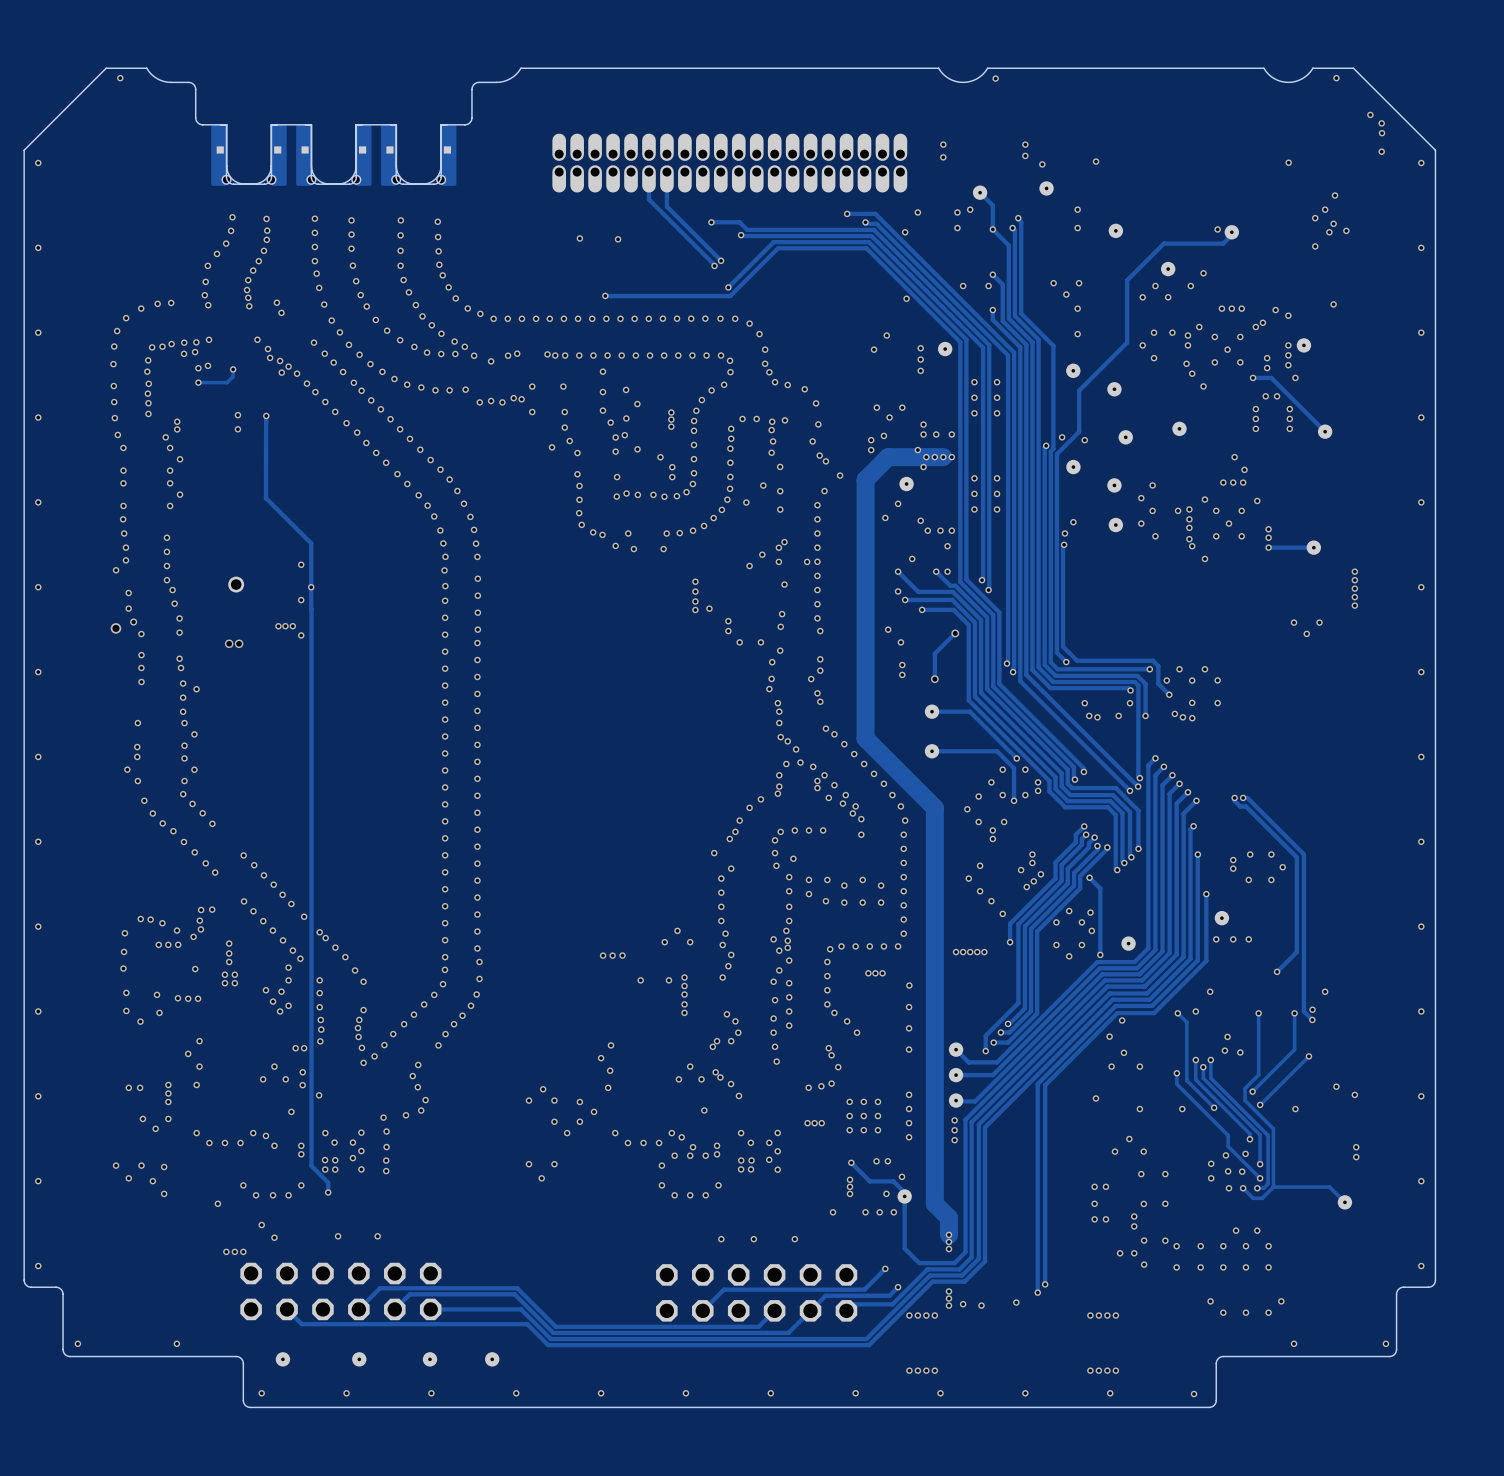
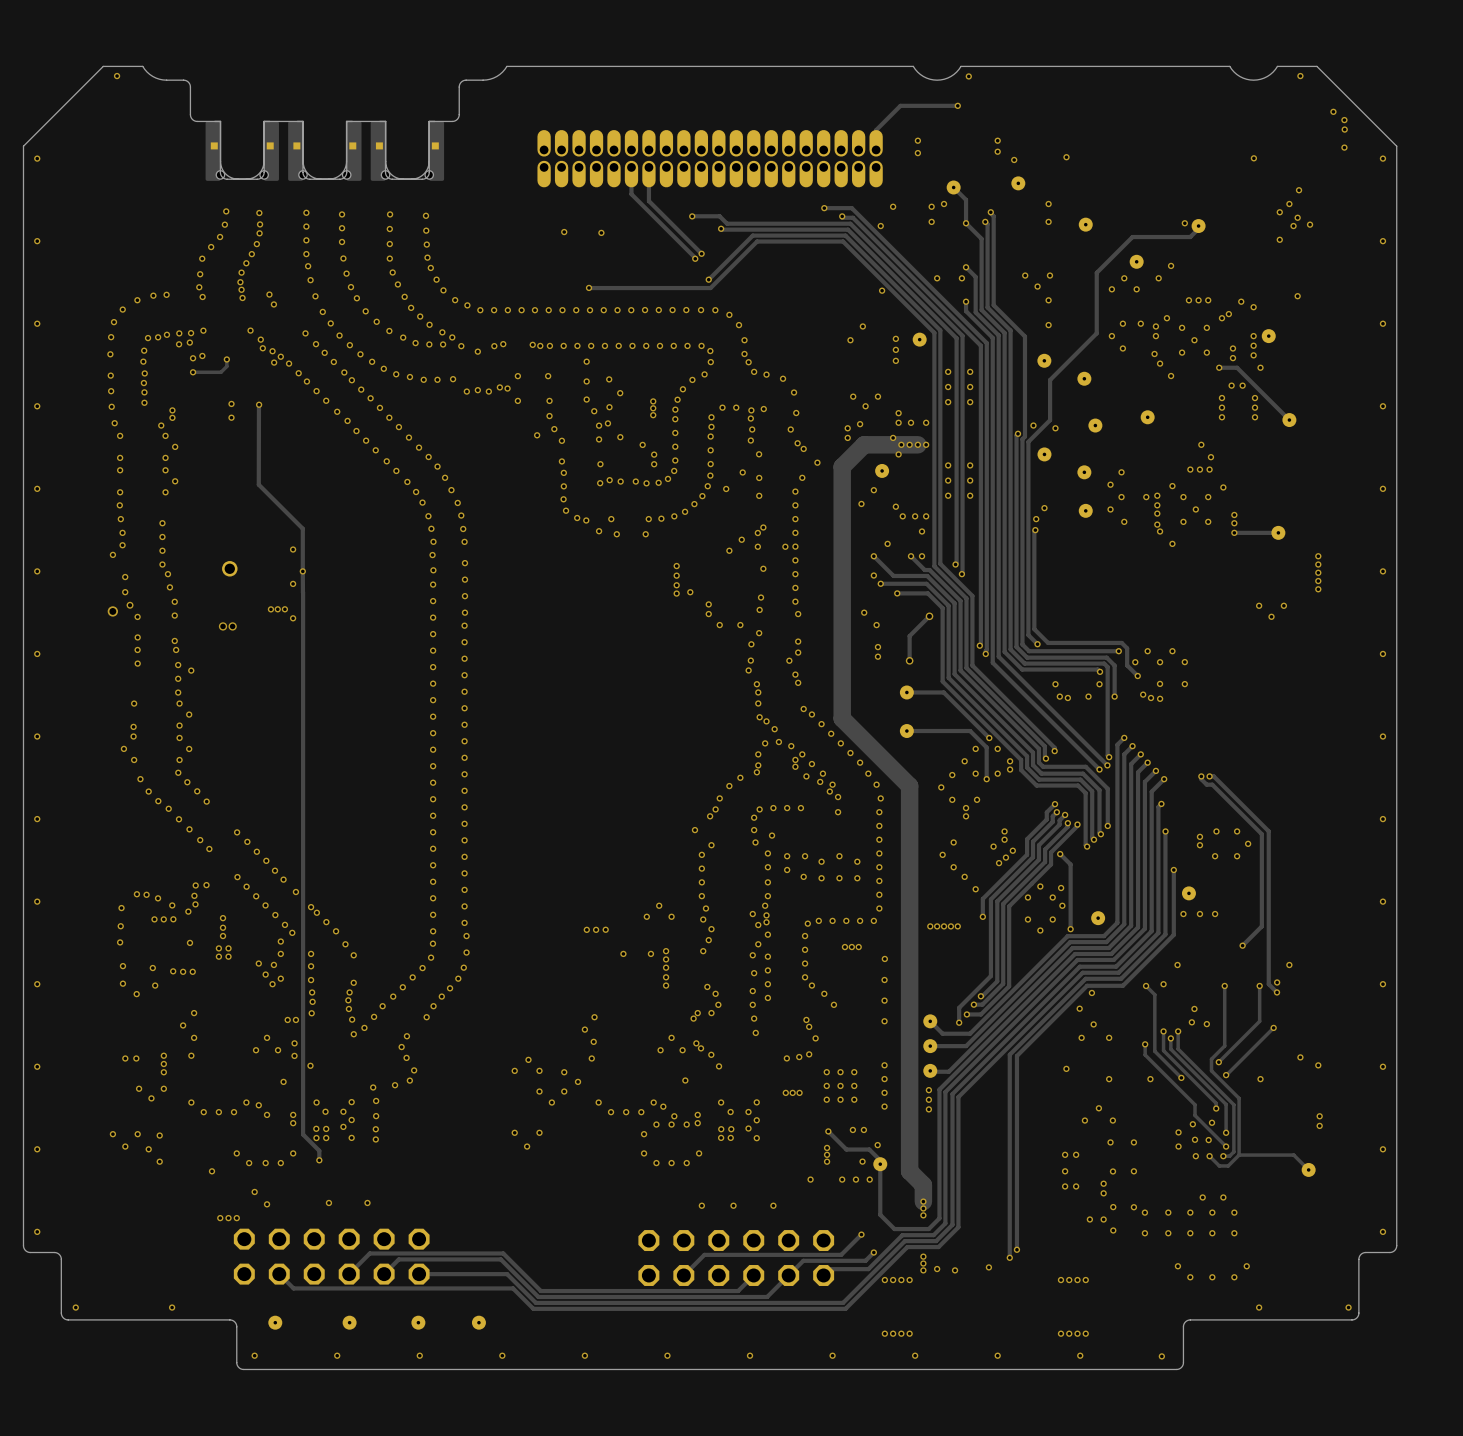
track: none -> (957, 105) (900, 105) (876, 130) (876, 149)
via: none -> (957, 105)

